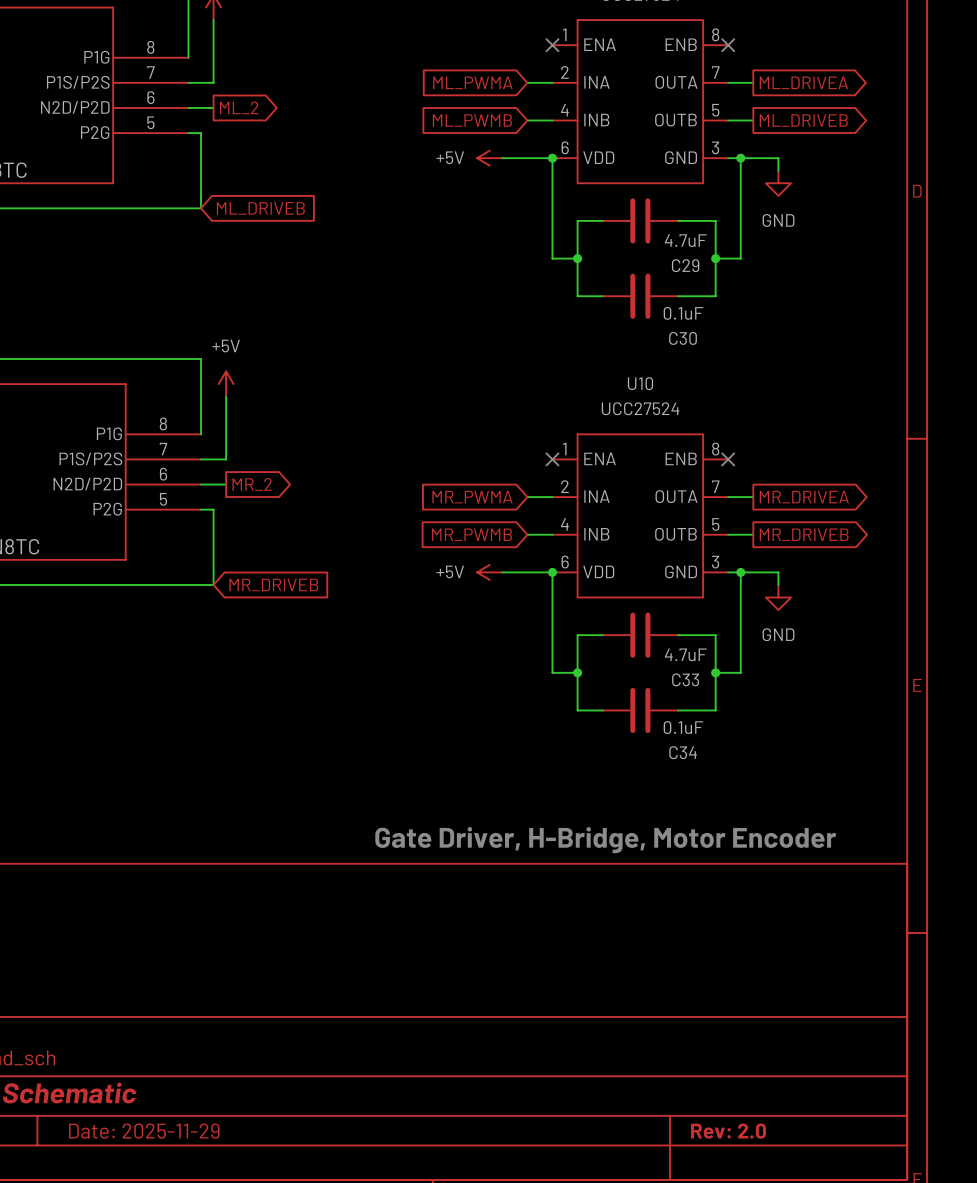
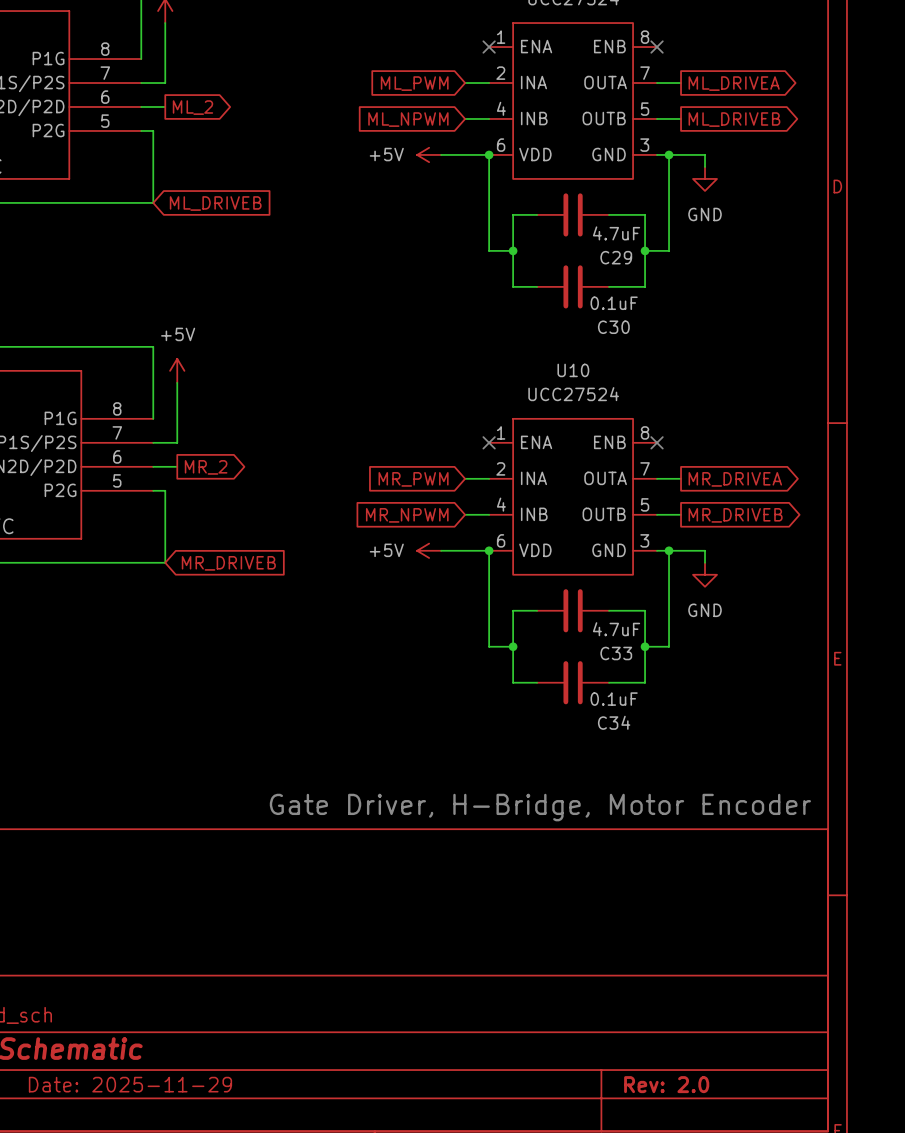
global label: ML_PWMA (472, 82) -> ML_PWM (414, 83)
global label: ML_PWMB (472, 120) -> ML_NPWM (408, 119)
global label: MR_PWMA (472, 497) -> MR_PWM (413, 479)
global label: MR_PWMB (472, 534) -> MR_NPWM (407, 515)

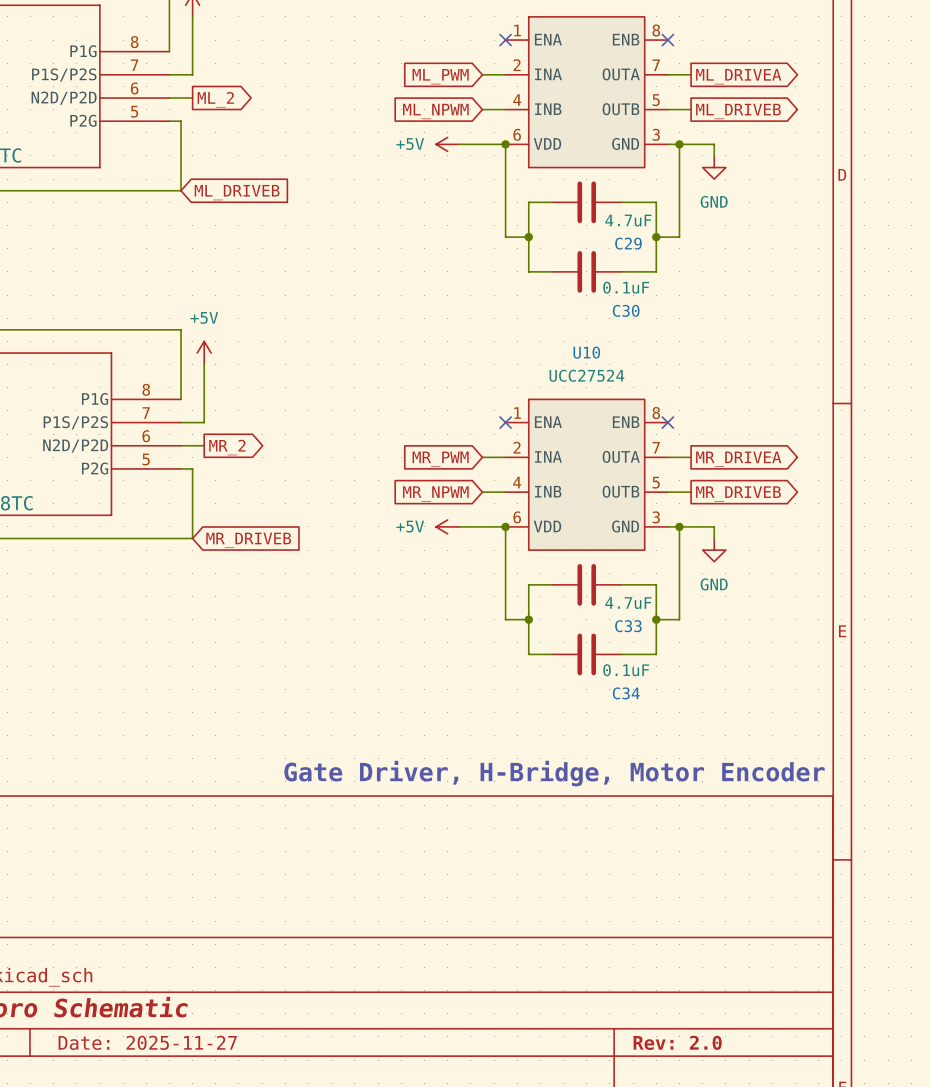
title block: Date: 2025-11-29 (130, 1084) -> Date: 2025-11-27 (147, 1042)

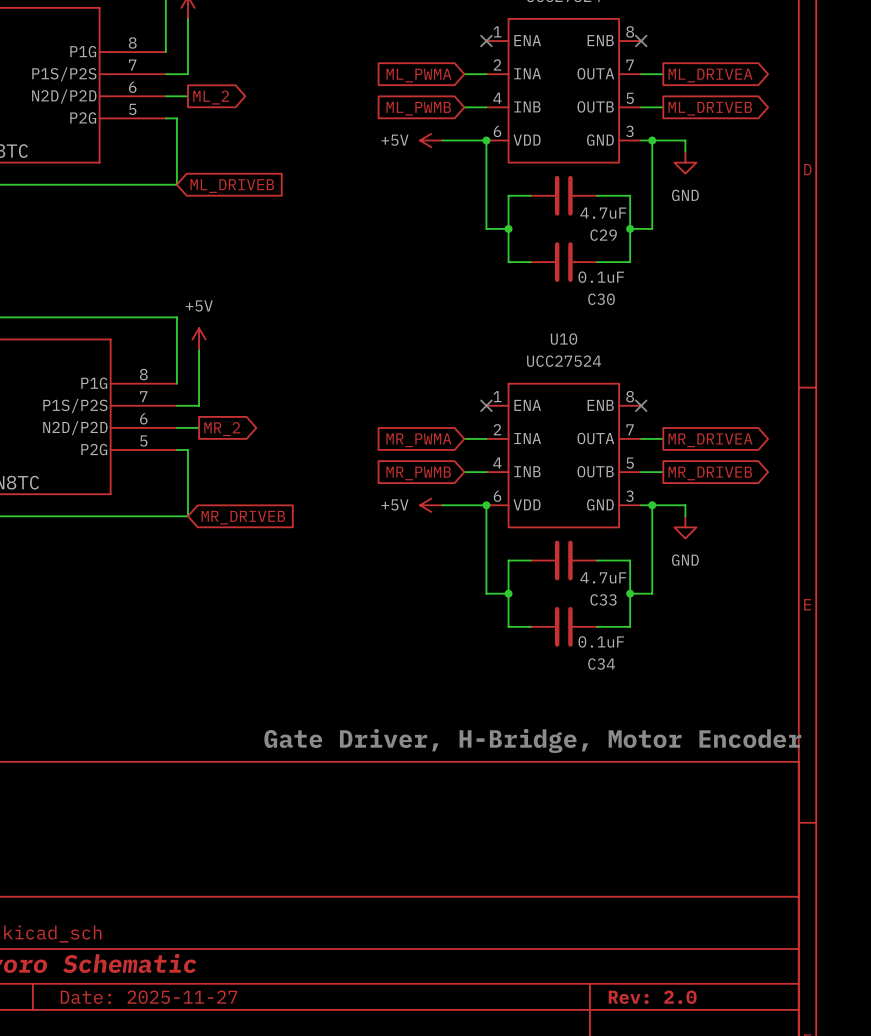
global label: ML_PWM (440, 76) -> ML_PWMA (418, 75)
global label: ML_NPWM (435, 111) -> ML_PWMB (418, 108)
global label: MR_PWM (440, 459) -> MR_PWMA (418, 440)
global label: MR_NPWM (435, 494) -> MR_PWMB (418, 473)

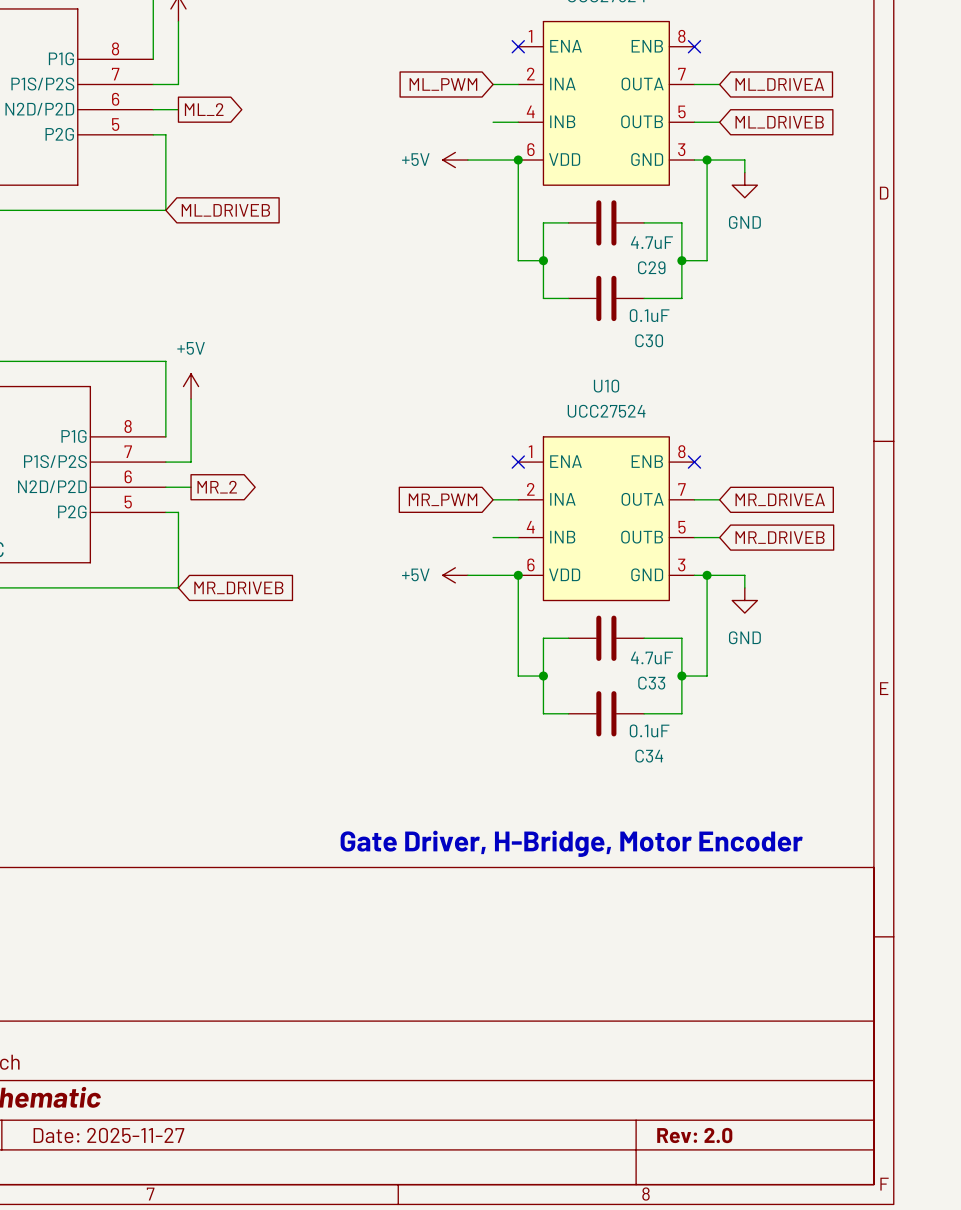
global label: ML_PWMA (418, 75) -> ML_PWM (443, 84)
global label shape: output (710, 75) -> input (779, 84)
global label: ML_PWMB (418, 108) -> none
global label shape: output (710, 108) -> input (779, 122)
global label: MR_PWMA (418, 440) -> MR_PWM (443, 499)
global label shape: output (710, 440) -> input (780, 499)
global label: MR_PWMB (418, 473) -> none
global label shape: output (710, 473) -> input (780, 537)

